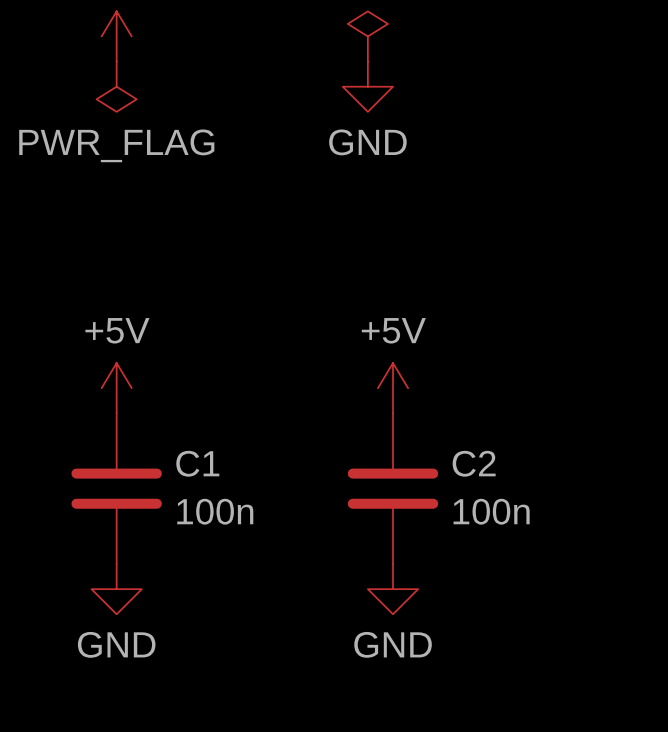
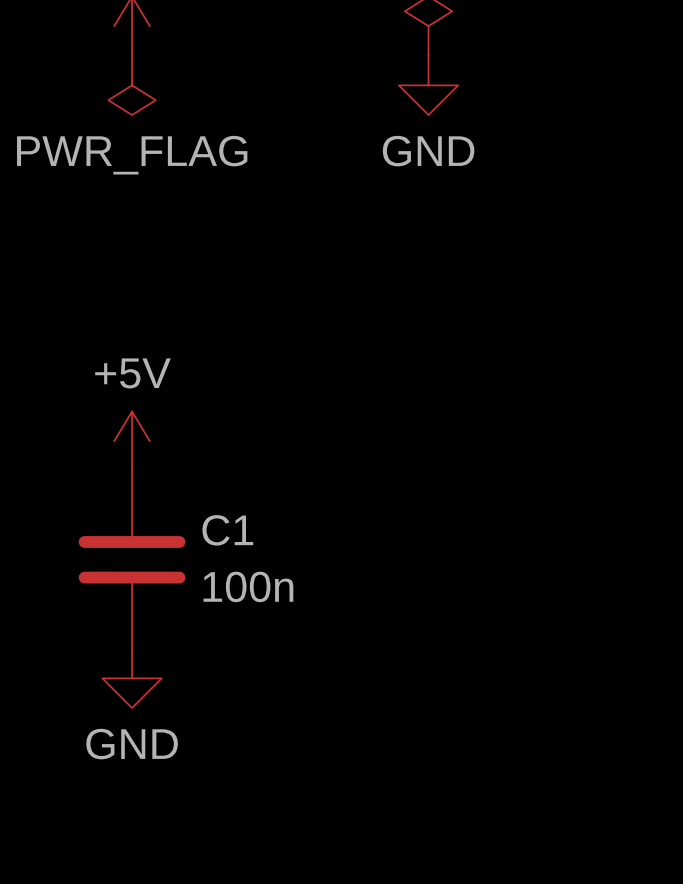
power symbol: +5V (393, 388) -> none
C2: 100n (393, 488) -> none
power symbol: GND (393, 589) -> none

